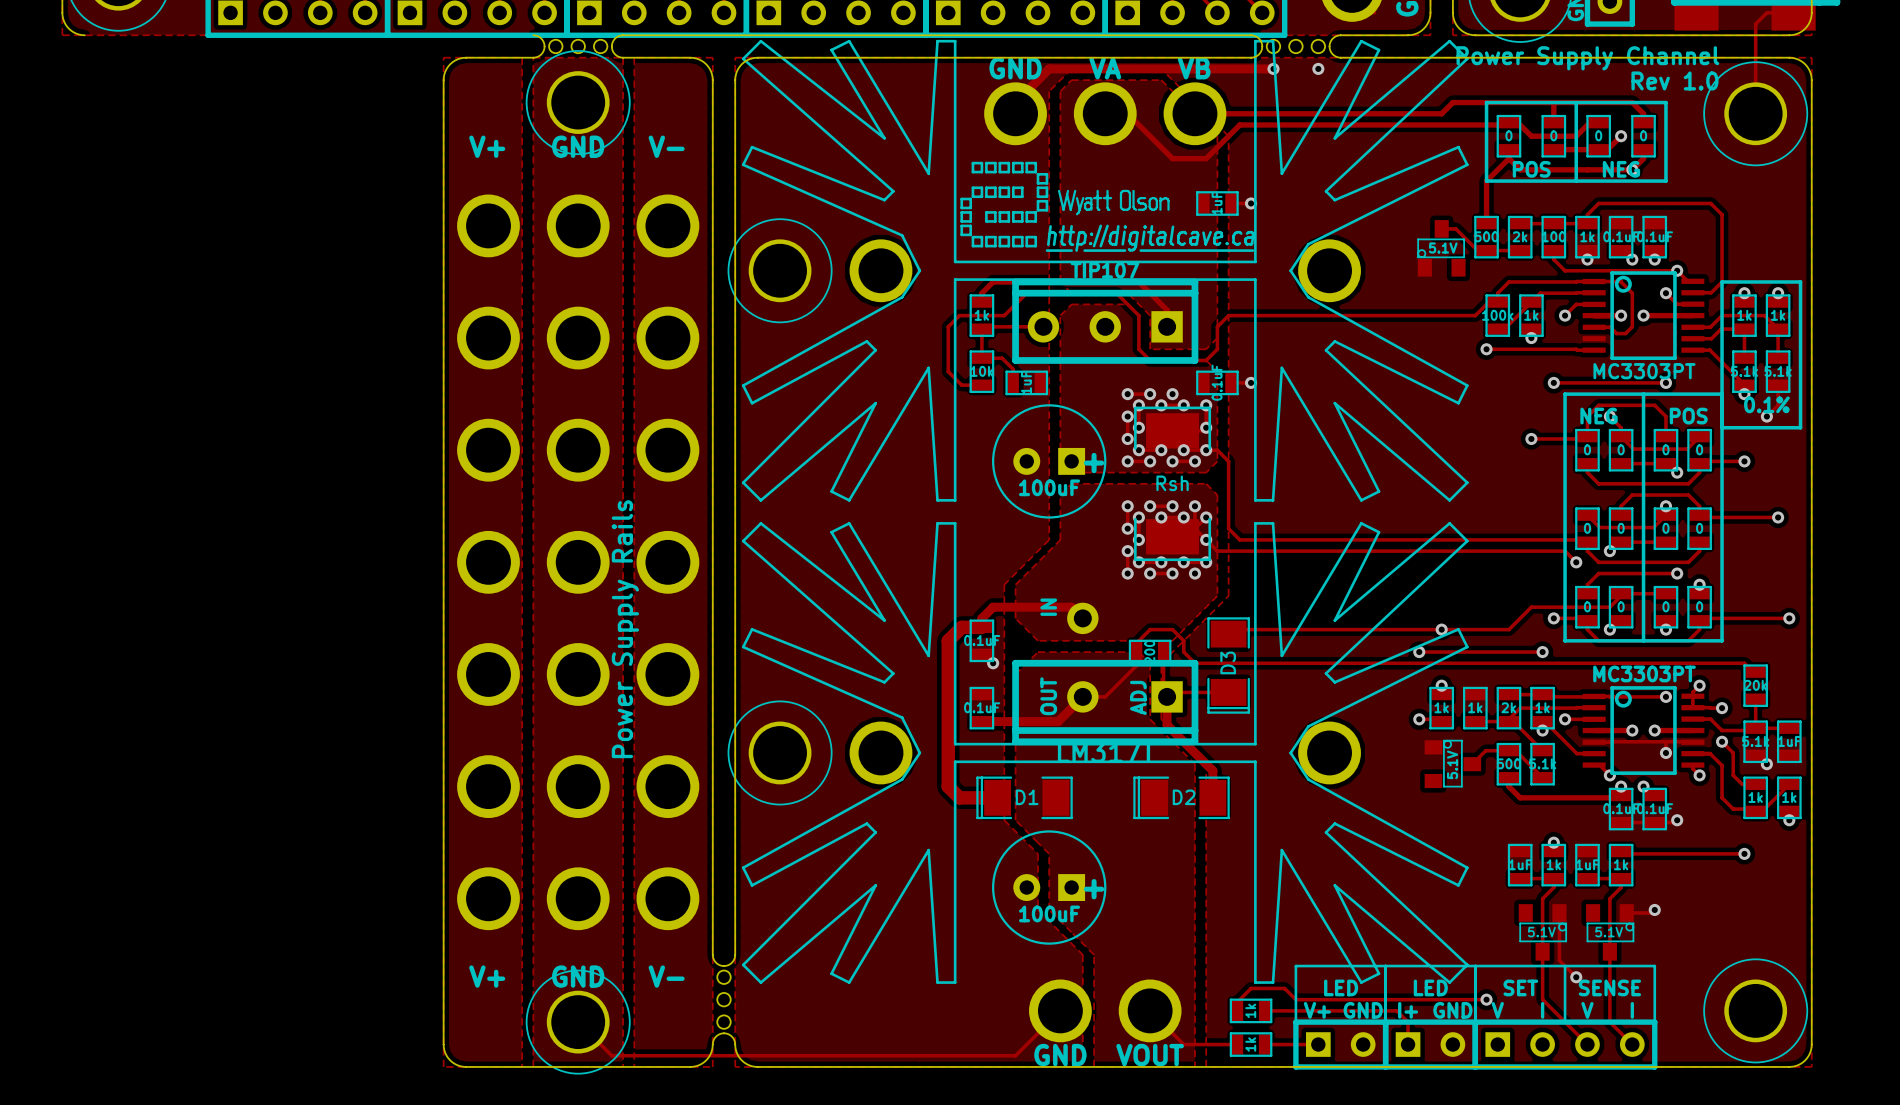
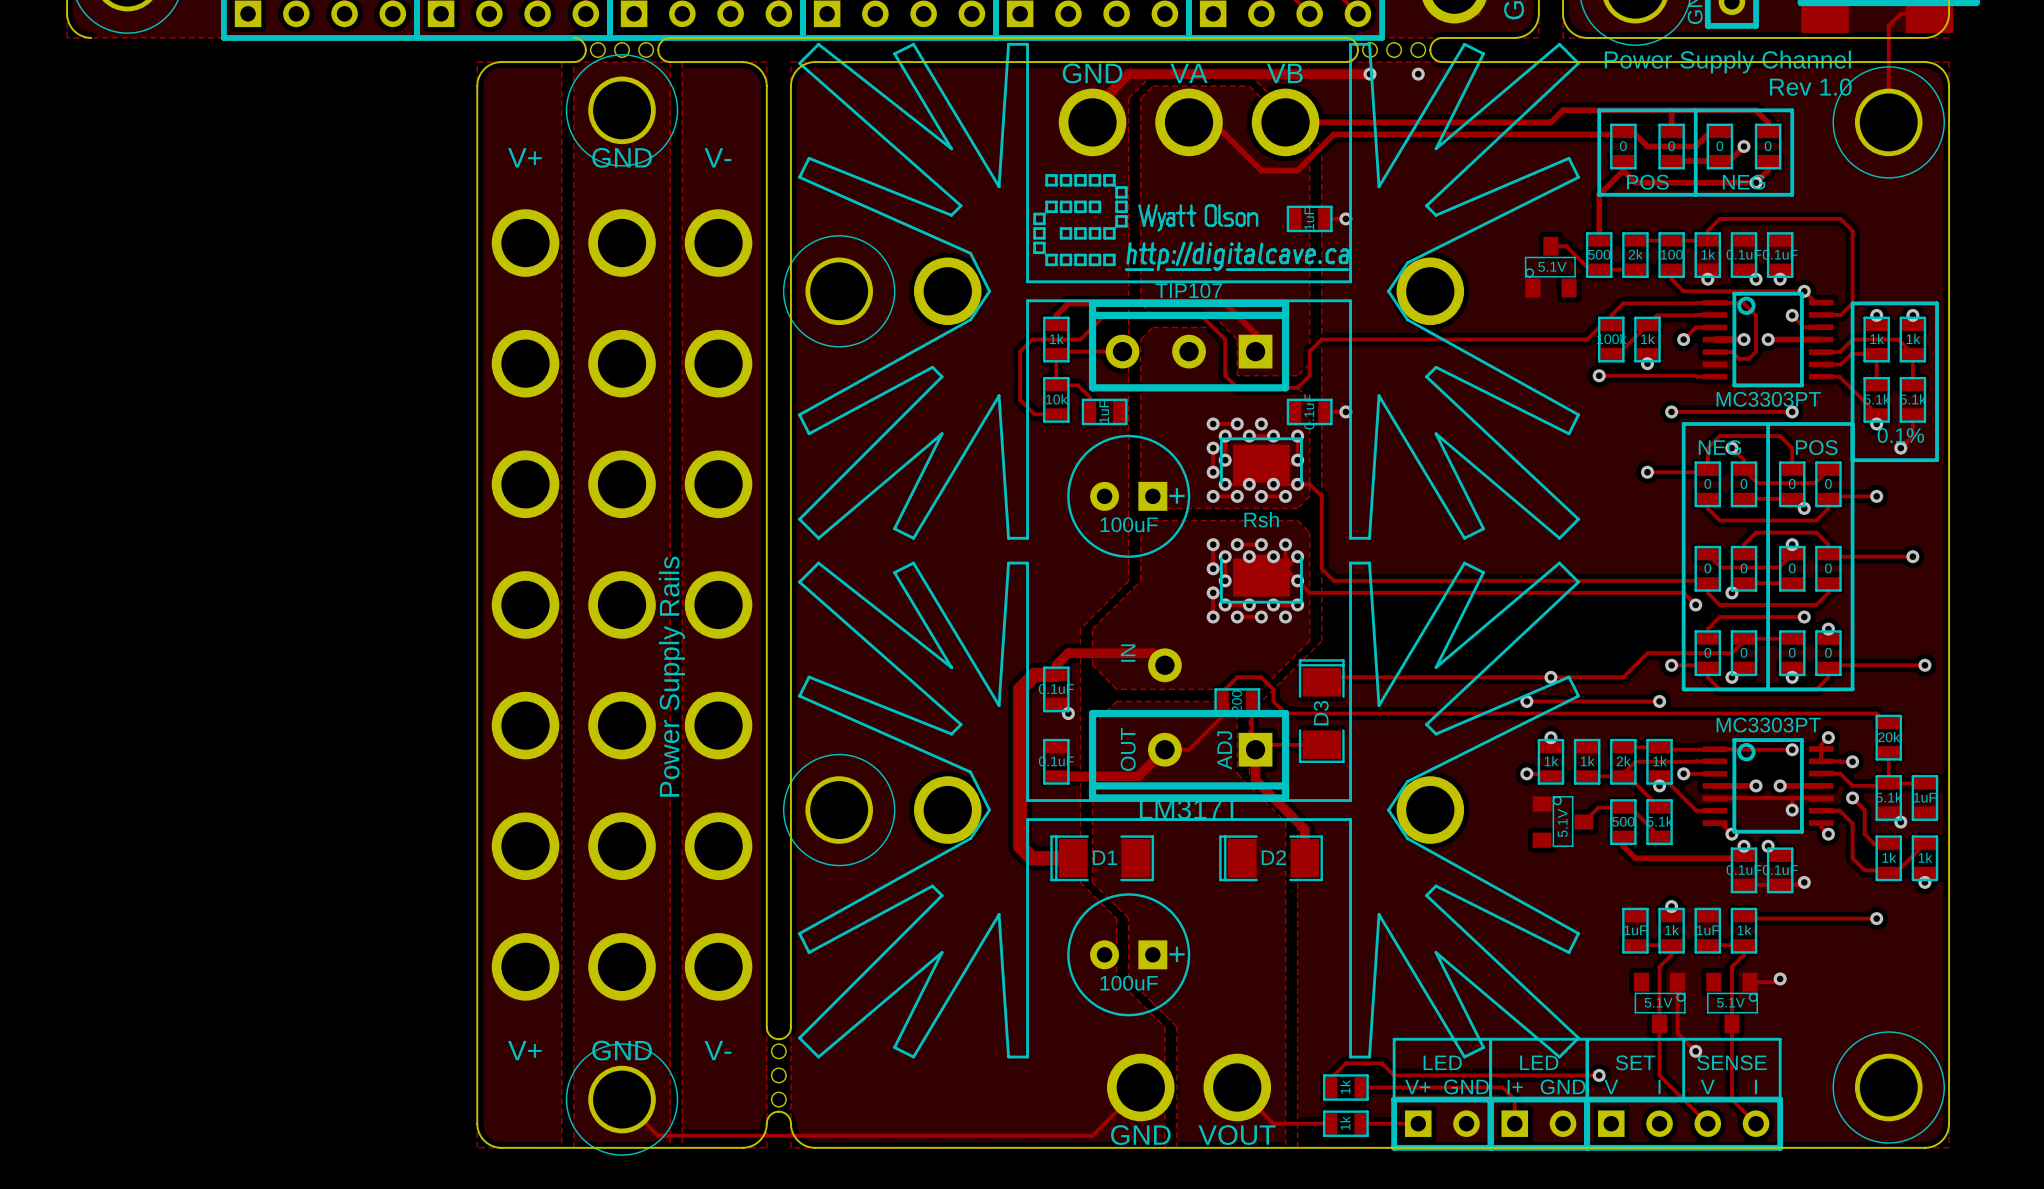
D3 rotation: 0° (1228, 665) -> 180° (1321, 711)

